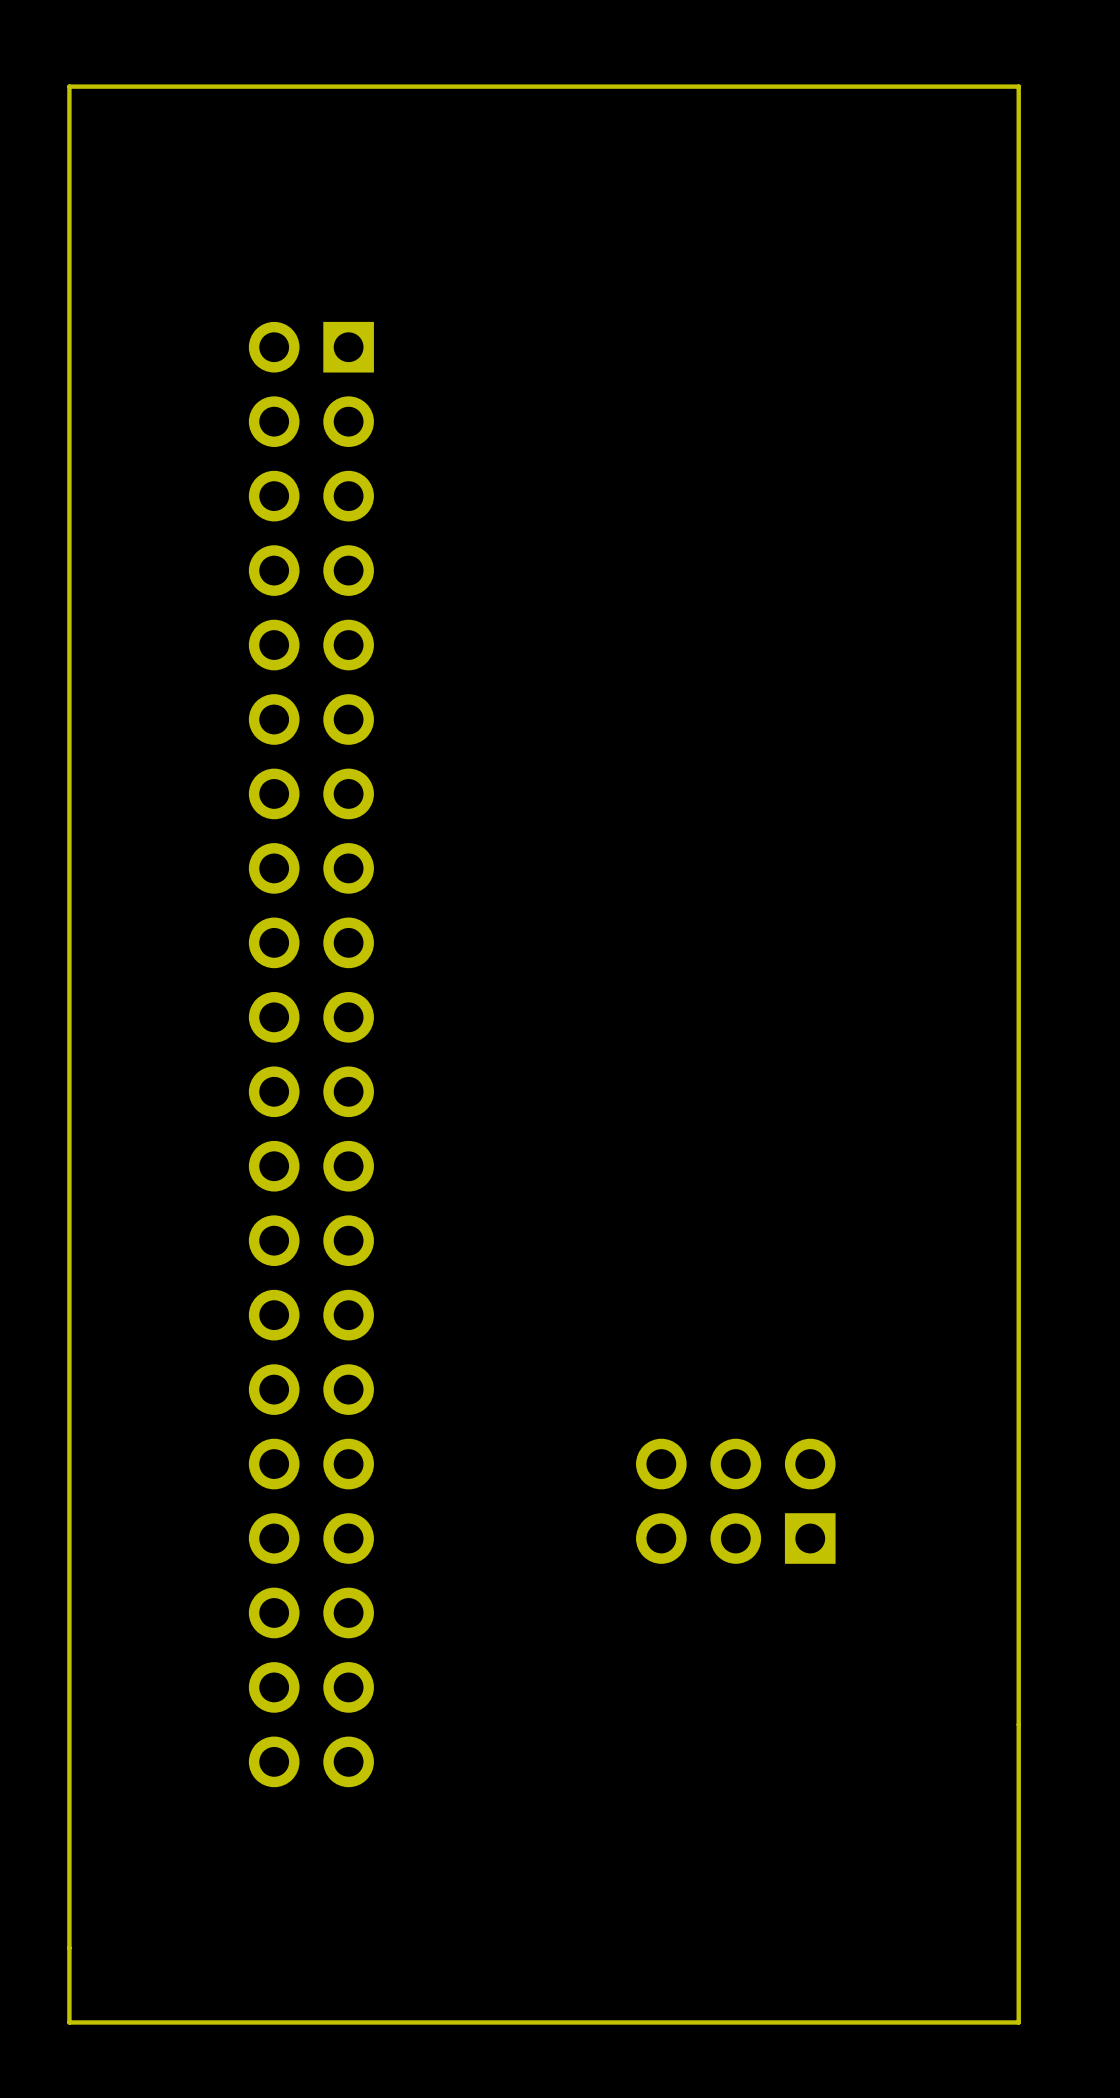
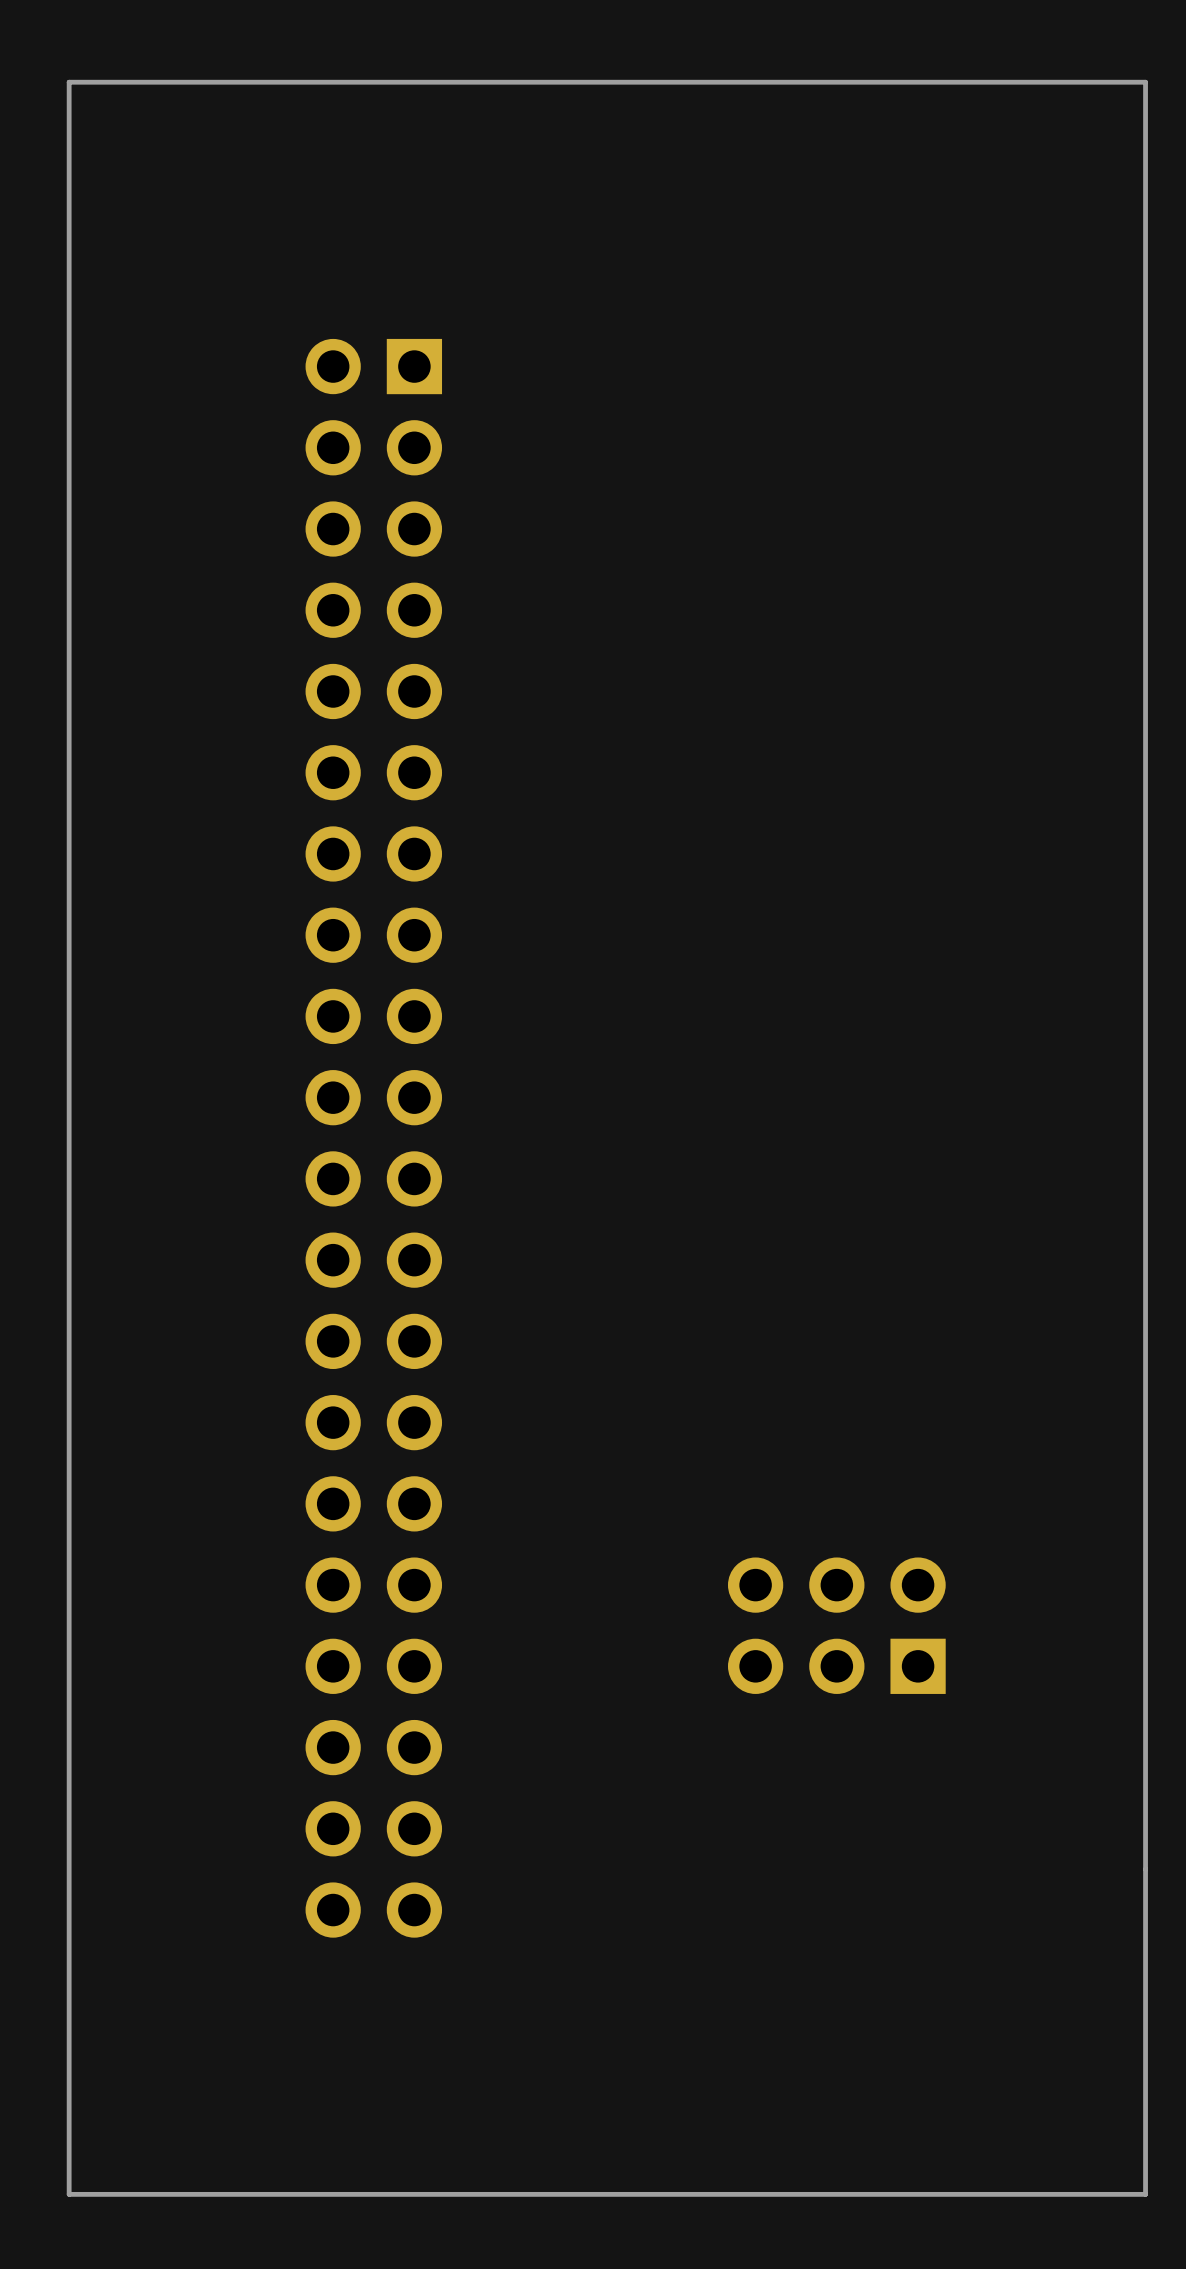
board edge: (69, 86) (69, 2022) -> (109, 82) (69, 82) (69, 2194) (109, 2194)

